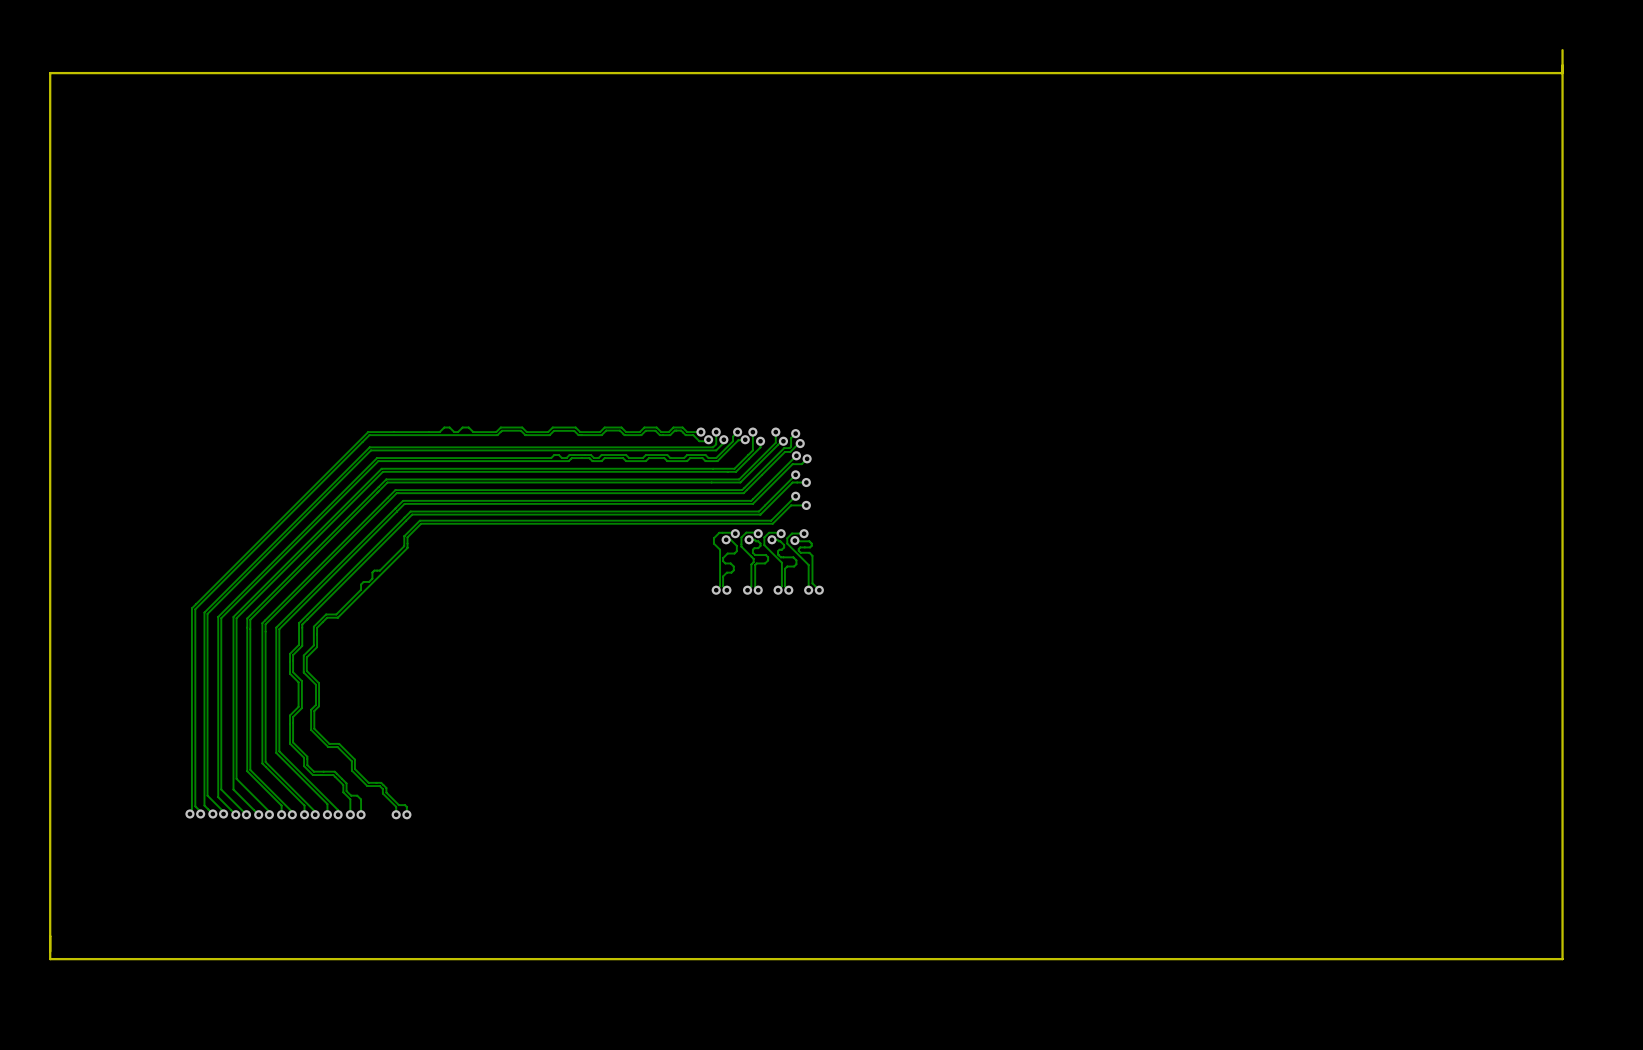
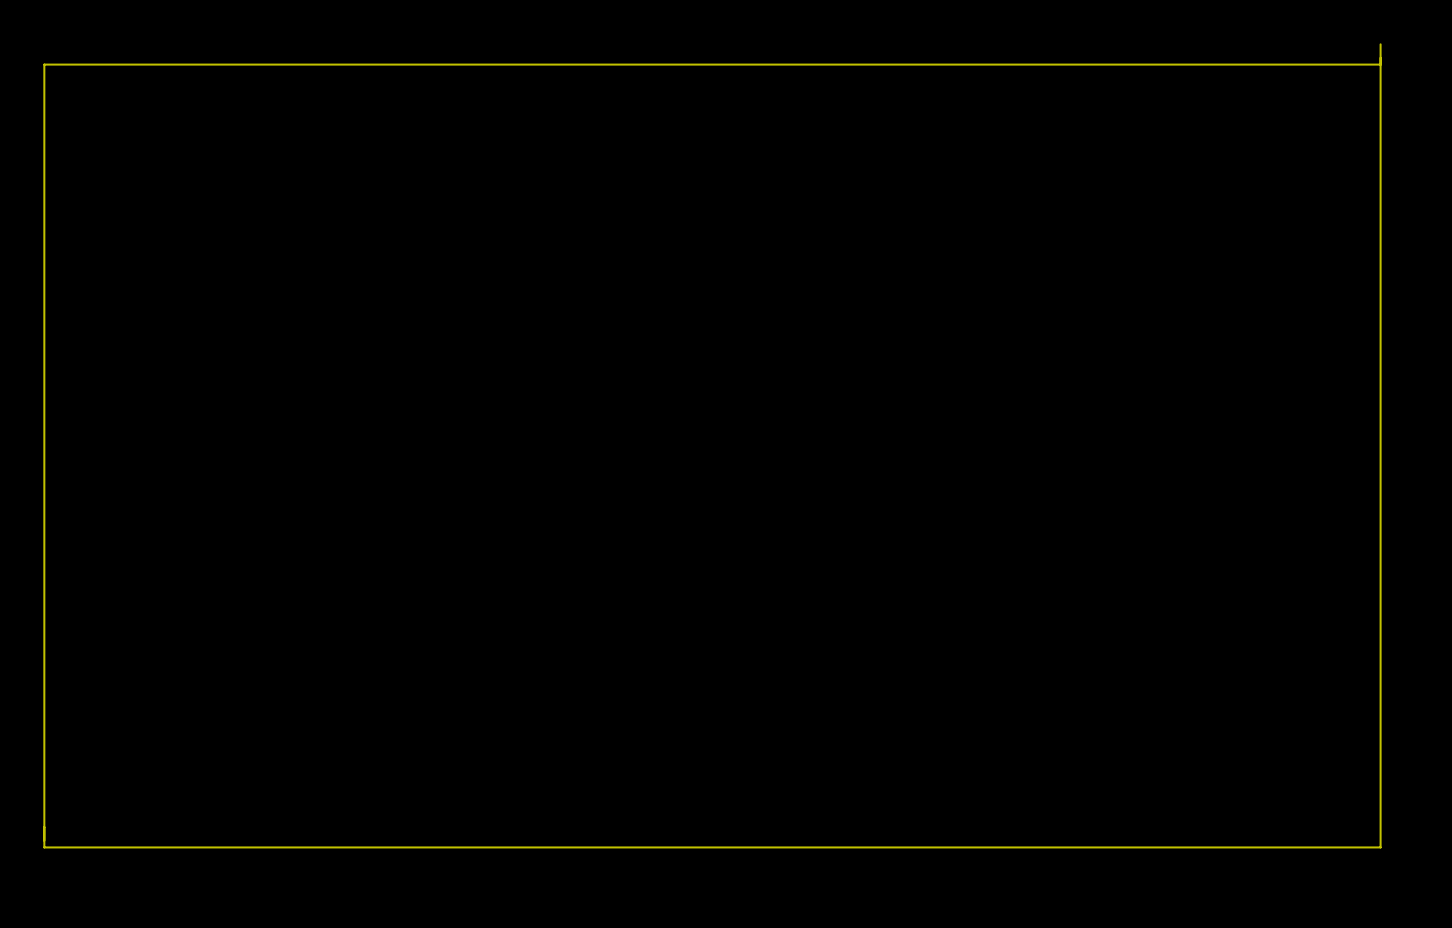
track: (700, 432) (687, 432) (682, 427) (673, 427) (668, 432) (661, 432) (656, 427) (644, 427) (639, 432) (626, 432) (621, 427) (604, 427) (600, 432) (580, 432) (575, 427) (552, 427) (548, 432) (526, 432) (522, 427) (500, 427) (496, 432) (473, 432) (468, 427) (462, 427) (458, 432) (454, 432) (449, 427) (444, 427) (439, 432) (368, 432) (191, 608) (191, 812) (189, 814) -> none
via: (700, 432) -> none
track: (716, 432) (716, 444) (713, 447) (369, 447) (204, 612) (204, 805) (212, 814) -> none
via: (716, 432) -> none
track: (737, 432) (733, 436) (733, 441) (716, 458) (708, 458) (705, 455) (687, 455) (684, 458) (670, 458) (667, 455) (645, 455) (642, 458) (629, 458) (626, 455) (601, 455) (598, 458) (594, 458) (590, 455) (569, 455) (566, 458) (561, 458) (558, 455) (554, 455) (551, 458) (377, 458) (218, 616) (218, 797) (235, 814) -> none
via: (737, 432) -> none
track: (752, 432) (752, 450) (734, 468) (381, 468) (233, 616) (233, 789) (258, 814) -> none
via: (752, 432) -> none
track: (775, 432) (775, 442) (739, 479) (386, 479) (247, 618) (247, 771) (281, 805) (281, 814) -> none
via: (775, 432) -> none
track: (795, 433) (791, 438) (791, 446) (784, 448) (742, 490) (395, 490) (262, 623) (262, 763) (304, 805) (304, 814) -> none
via: (795, 433) -> none
track: (708, 439) (699, 441) (693, 435) (685, 435) (681, 430) (674, 430) (670, 435) (659, 435) (655, 430) (645, 430) (641, 435) (624, 435) (619, 430) (606, 430) (601, 435) (578, 435) (574, 430) (553, 430) (549, 435) (525, 435) (521, 430) (501, 430) (497, 435) (369, 435) (195, 609) (195, 806) (200, 814) -> none
via: (708, 439) -> none
track: (723, 439) (723, 442) (716, 450) (370, 450) (207, 613) (207, 795) (223, 811) (223, 814) -> none
via: (723, 439) -> none
via: (745, 439) -> none
track: (744, 440) (738, 440) (717, 461) (705, 461) (702, 458) (690, 458) (687, 461) (667, 461) (664, 458) (649, 458) (645, 461) (626, 461) (623, 458) (604, 458) (601, 461) (592, 461) (589, 458) (571, 458) (568, 461) (378, 461) (221, 618) (221, 789) (246, 814) -> none
track: (760, 441) (760, 447) (736, 471) (382, 471) (236, 618) (236, 778) (269, 811) (269, 814) -> none
via: (760, 441) -> none
track: (783, 441) (740, 482) (387, 482) (250, 619) (250, 769) (292, 811) (292, 814) -> none
via: (783, 441) -> none
track: (800, 443) (790, 451) (784, 451) (743, 493) (396, 493) (265, 624) (265, 762) (315, 811) (315, 814) -> none
via: (800, 443) -> none
track: (796, 455) (751, 500) (403, 500) (276, 627) (276, 752) (327, 804) (327, 814) -> none
via: (796, 455) -> none
track: (807, 458) (801, 464) (792, 464) (752, 503) (404, 503) (279, 629) (279, 751) (338, 810) (338, 814) -> none
via: (807, 458) -> none
track: (795, 474) (759, 511) (410, 511) (299, 623) (299, 644) (290, 653) (290, 673) (298, 682) (298, 706) (290, 715) (290, 743) (304, 757) (304, 766) (312, 775) (333, 775) (343, 784) (343, 792) (350, 799) (350, 814) -> none
via: (795, 474) -> none
track: (806, 482) (792, 482) (760, 514) (412, 514) (302, 624) (302, 645) (293, 655) (293, 672) (301, 681) (301, 708) (293, 716) (293, 742) (307, 756) (307, 765) (313, 771) (334, 771) (346, 783) (346, 791) (351, 795) (357, 795) (361, 799) (361, 814) -> none
via: (806, 482) -> none
track: (795, 496) (771, 520) (419, 520) (404, 536) (404, 546) (379, 570) (372, 572) (372, 578) (369, 581) (363, 581) (361, 584) (361, 589) (336, 614) (326, 614) (313, 626) (313, 645) (303, 655) (303, 672) (315, 684) (315, 704) (311, 709) (311, 729) (328, 747) (337, 747) (351, 761) (351, 770) (367, 786) (379, 786) (382, 789) (382, 793) (396, 806) (396, 814) -> none
via: (795, 496) -> none
track: (806, 505) (791, 505) (772, 523) (421, 523) (407, 537) (407, 548) (337, 617) (327, 617) (317, 627) (317, 647) (306, 657) (306, 671) (319, 683) (319, 706) (314, 711) (314, 728) (329, 743) (339, 743) (354, 759) (354, 769) (368, 782) (381, 782) (386, 788) (386, 792) (398, 804) -> none
via: (806, 505) -> none
track: (735, 533) (719, 532) (713, 538) (713, 543) (720, 549) (720, 586) (716, 590) -> none
via: (735, 533) -> none
track: (758, 533) (746, 532) (741, 537) (741, 546) (753, 558) (751, 564) (751, 586) (747, 590) -> none
via: (758, 533) -> none
track: (781, 533) (769, 532) (764, 537) (764, 545) (781, 562) (781, 586) (778, 590) -> none
via: (781, 533) -> none
track: (803, 533) (792, 533) (787, 538) (787, 543) (808, 564) (808, 590) -> none
via: (804, 533) -> none
track: (726, 539) (730, 539) (736, 545) (736, 551) (734, 553) (727, 553) (723, 558) (725, 563) (730, 563) (733, 566) (731, 572) (726, 572) (723, 576) (723, 586) (726, 590) -> none
via: (726, 539) -> none
track: (749, 539) (754, 539) (760, 543) (758, 548) (752, 549) (755, 555) (765, 555) (768, 557) (765, 563) (755, 564) (755, 587) (758, 590) -> none
via: (749, 539) -> none
track: (771, 539) (777, 539) (784, 545) (784, 547) (777, 551) (780, 557) (793, 557) (796, 560) (794, 566) (787, 566) (784, 568) (784, 586) (788, 590) -> none
via: (771, 539) -> none
track: (794, 540) (809, 541) (811, 543) (810, 547) (800, 547) (798, 550) (800, 552) (809, 552) (812, 555) (812, 583) (819, 590) -> none
via: (794, 540) -> none
via: (716, 590) -> none
via: (726, 590) -> none
via: (747, 590) -> none
via: (758, 590) -> none
via: (778, 590) -> none
via: (788, 590) -> none
via: (808, 590) -> none
via: (819, 590) -> none
track: (398, 805) (406, 806) (406, 814) -> none
via: (189, 814) -> none
via: (200, 814) -> none
via: (212, 814) -> none
via: (223, 814) -> none
via: (235, 814) -> none
via: (246, 814) -> none
via: (258, 814) -> none
via: (269, 814) -> none
via: (281, 814) -> none
via: (292, 814) -> none
via: (304, 814) -> none
via: (315, 814) -> none
via: (327, 814) -> none
via: (338, 814) -> none
via: (350, 814) -> none
via: (361, 814) -> none
via: (396, 814) -> none
via: (406, 814) -> none

